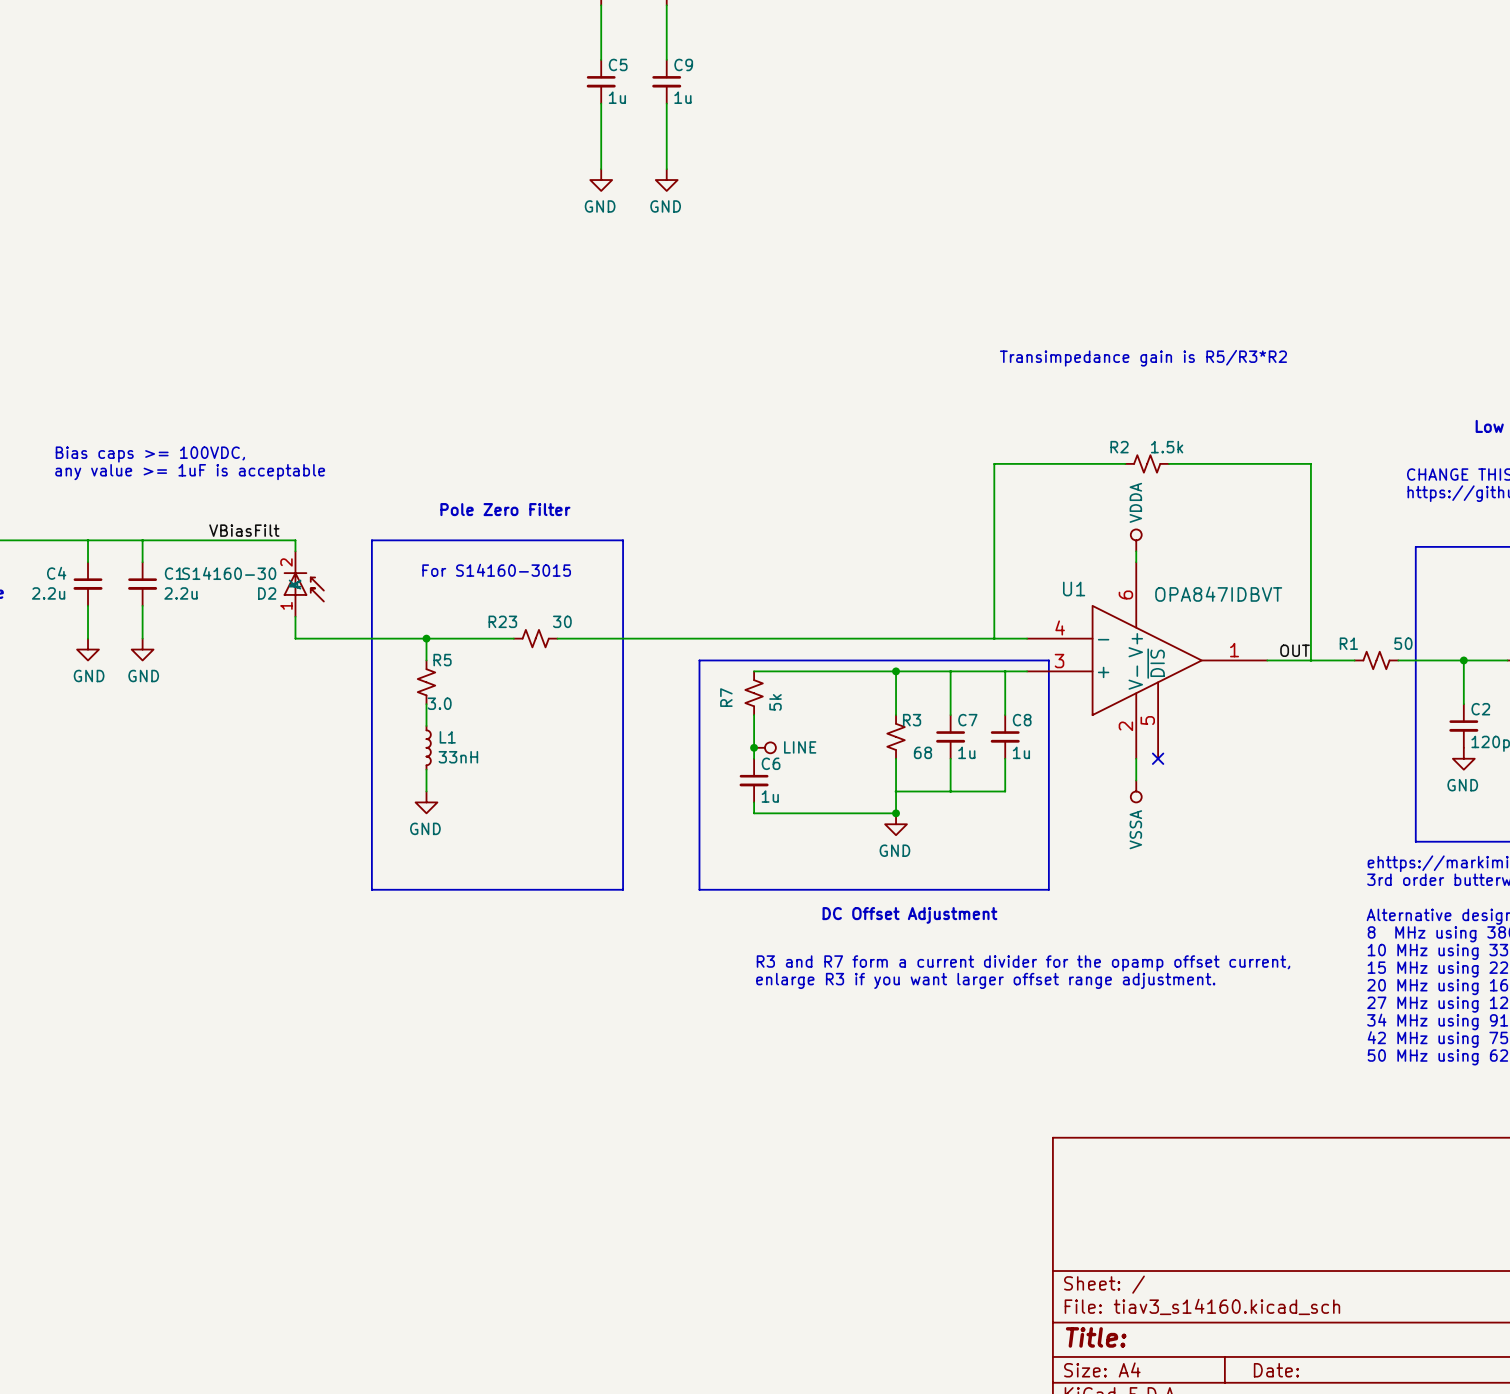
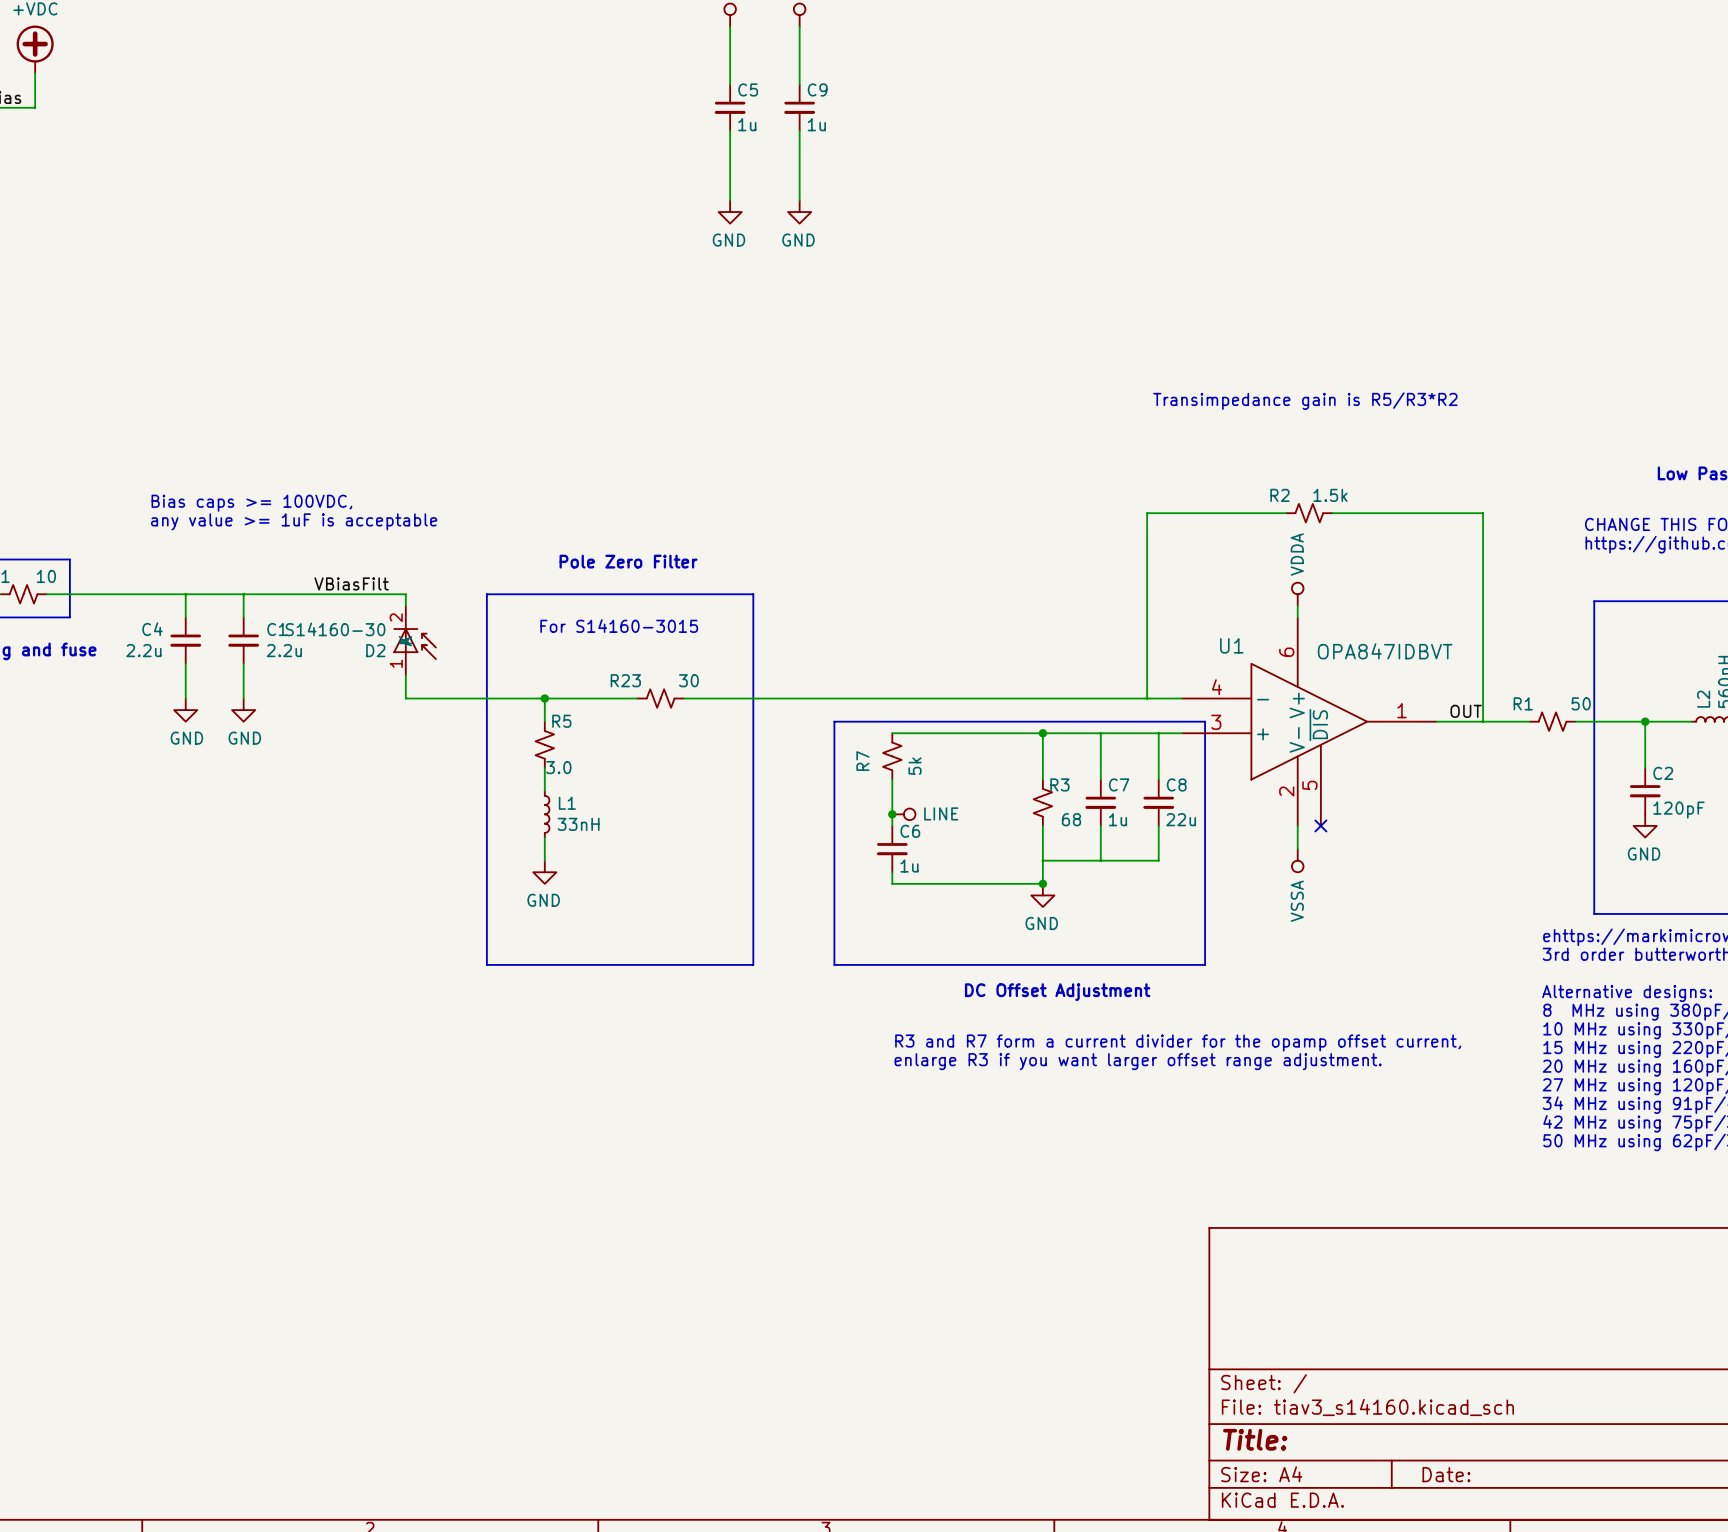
C8 value: 1u (1021, 752) -> 22u (1181, 819)

